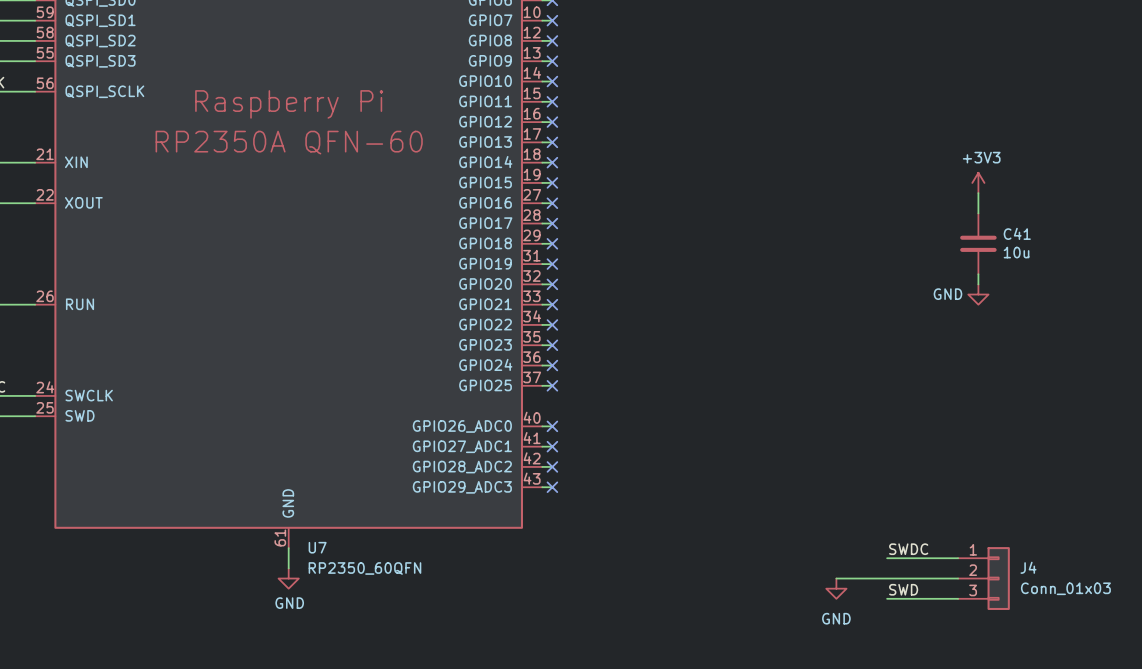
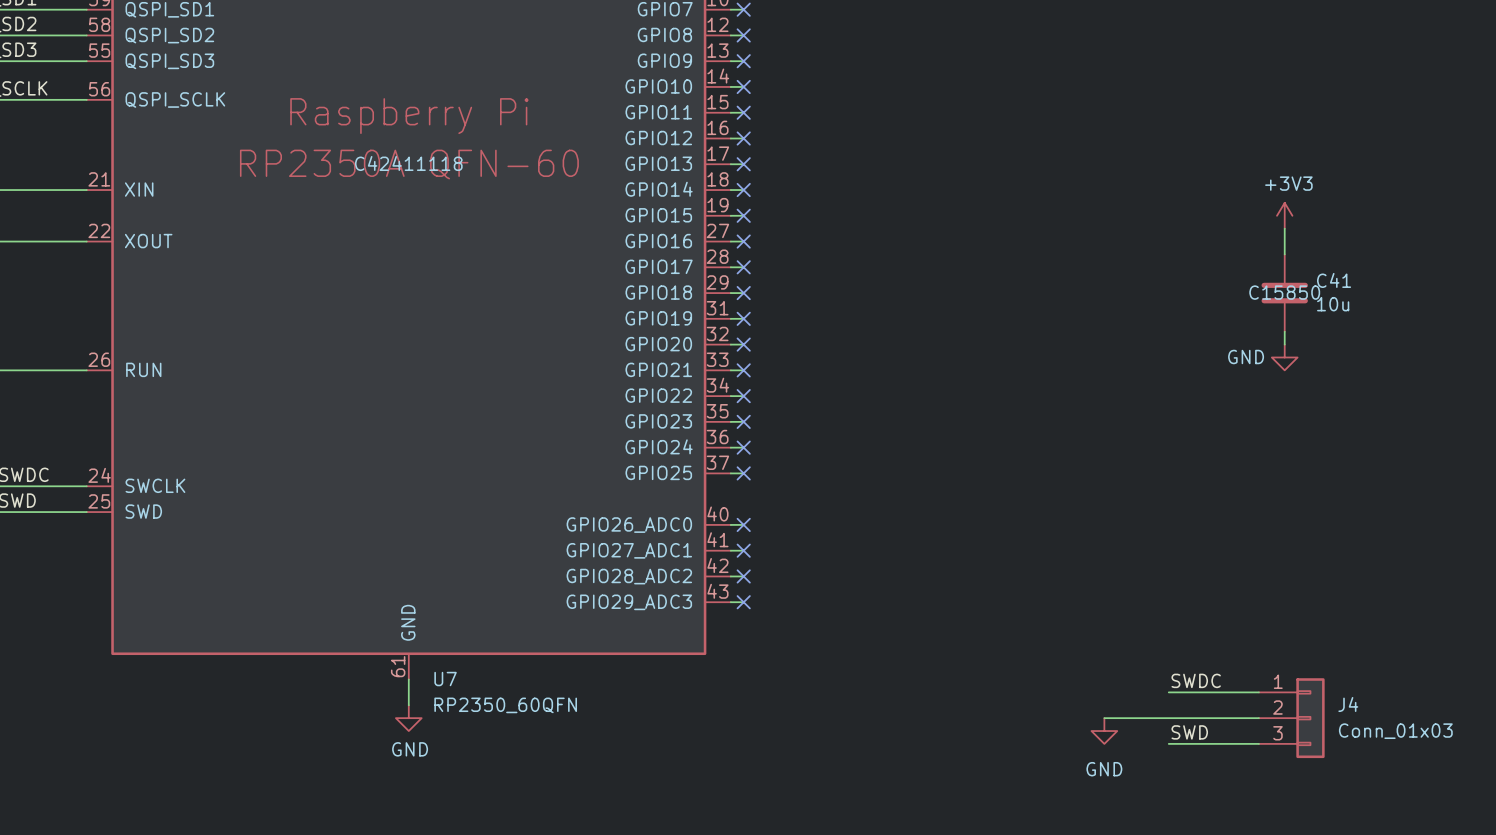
U7 text: none -> C42411118 (408, 163)
C41 text: none -> C15850 (1284, 292)

